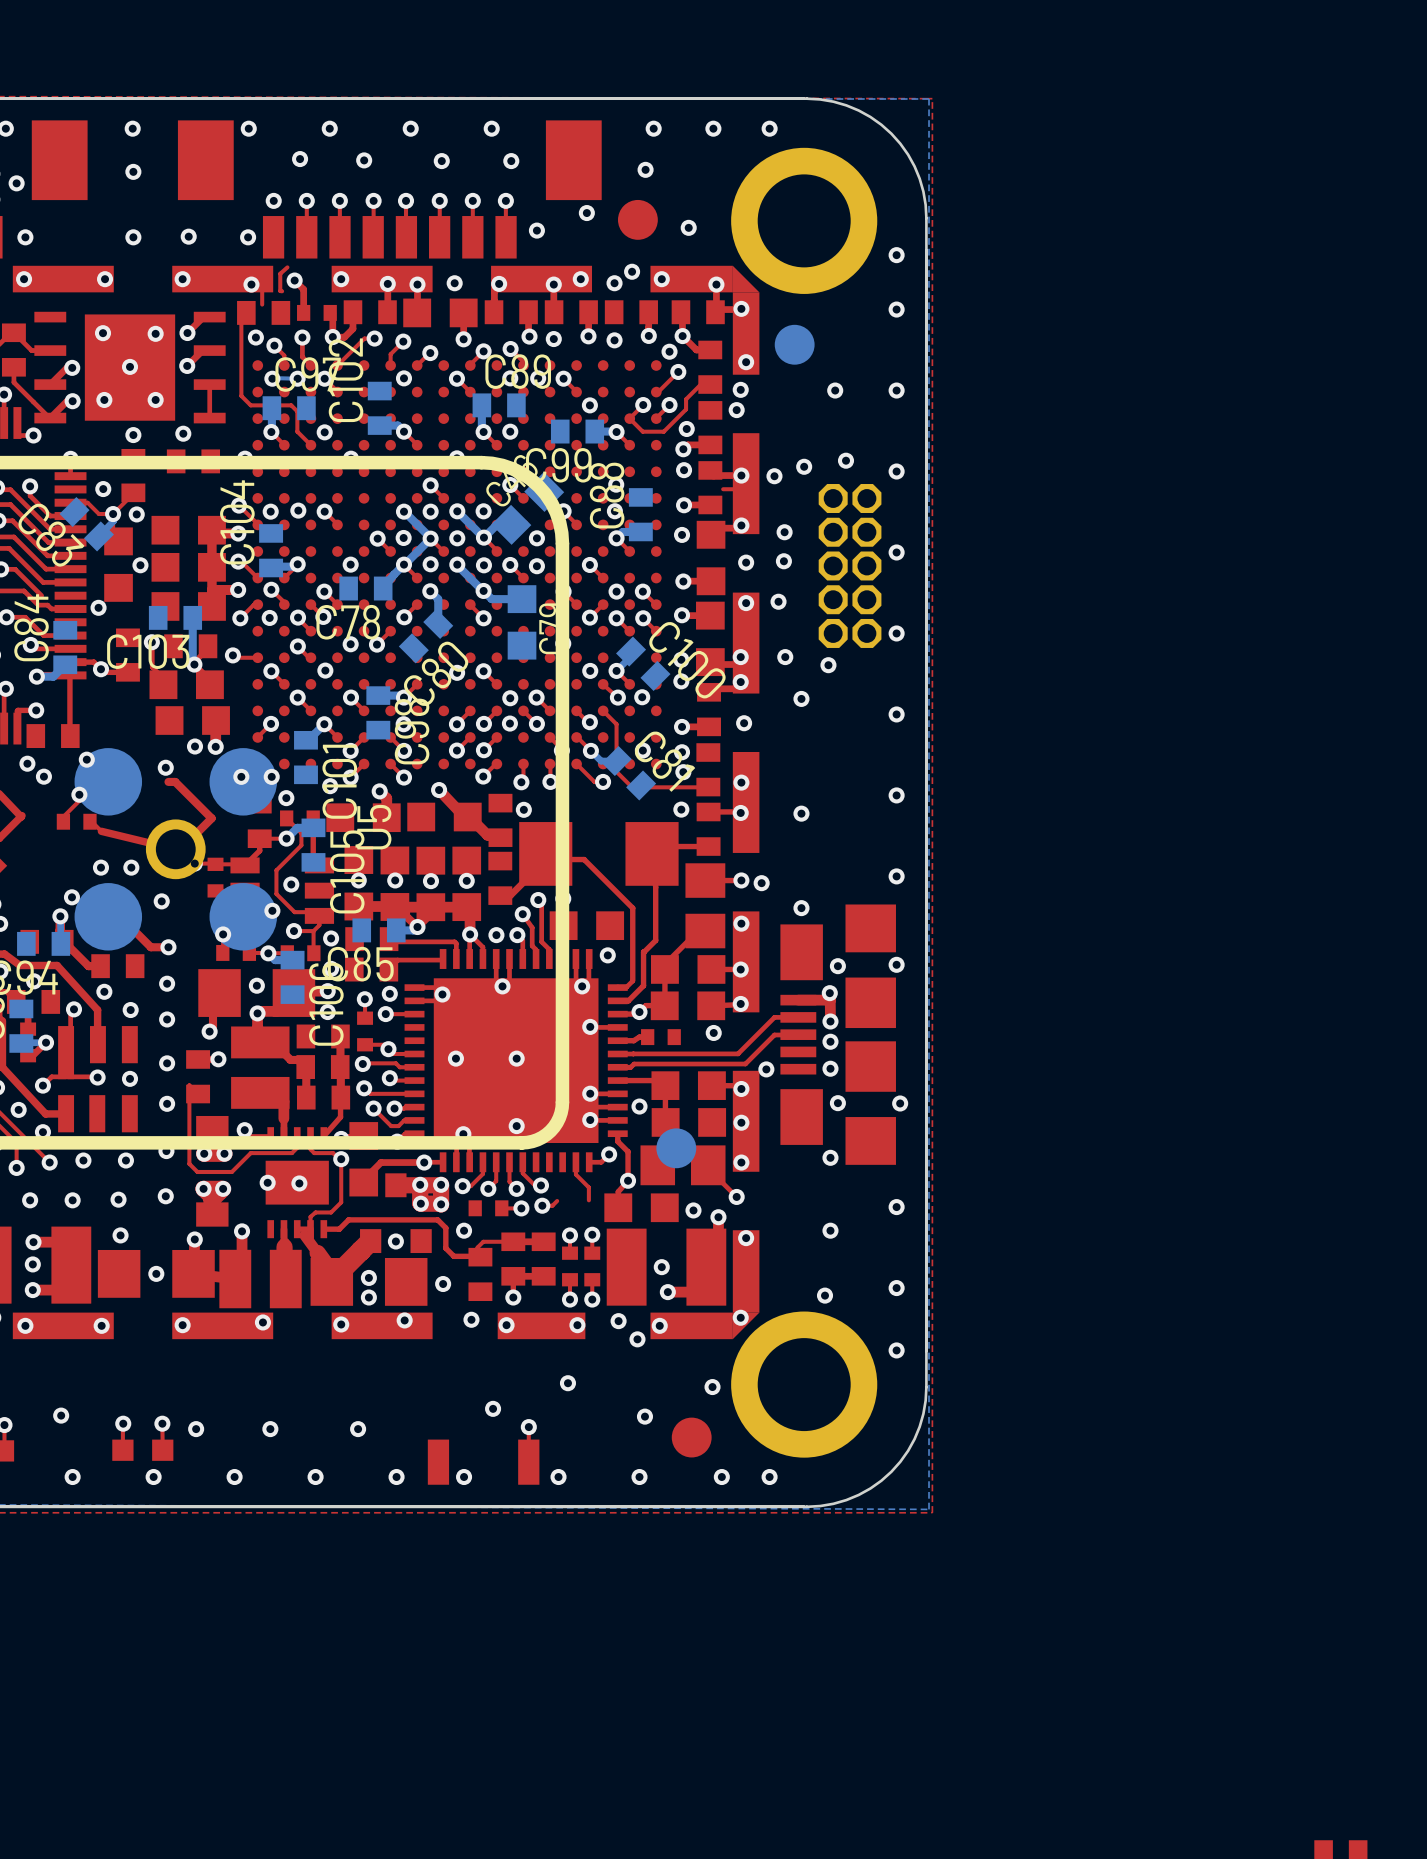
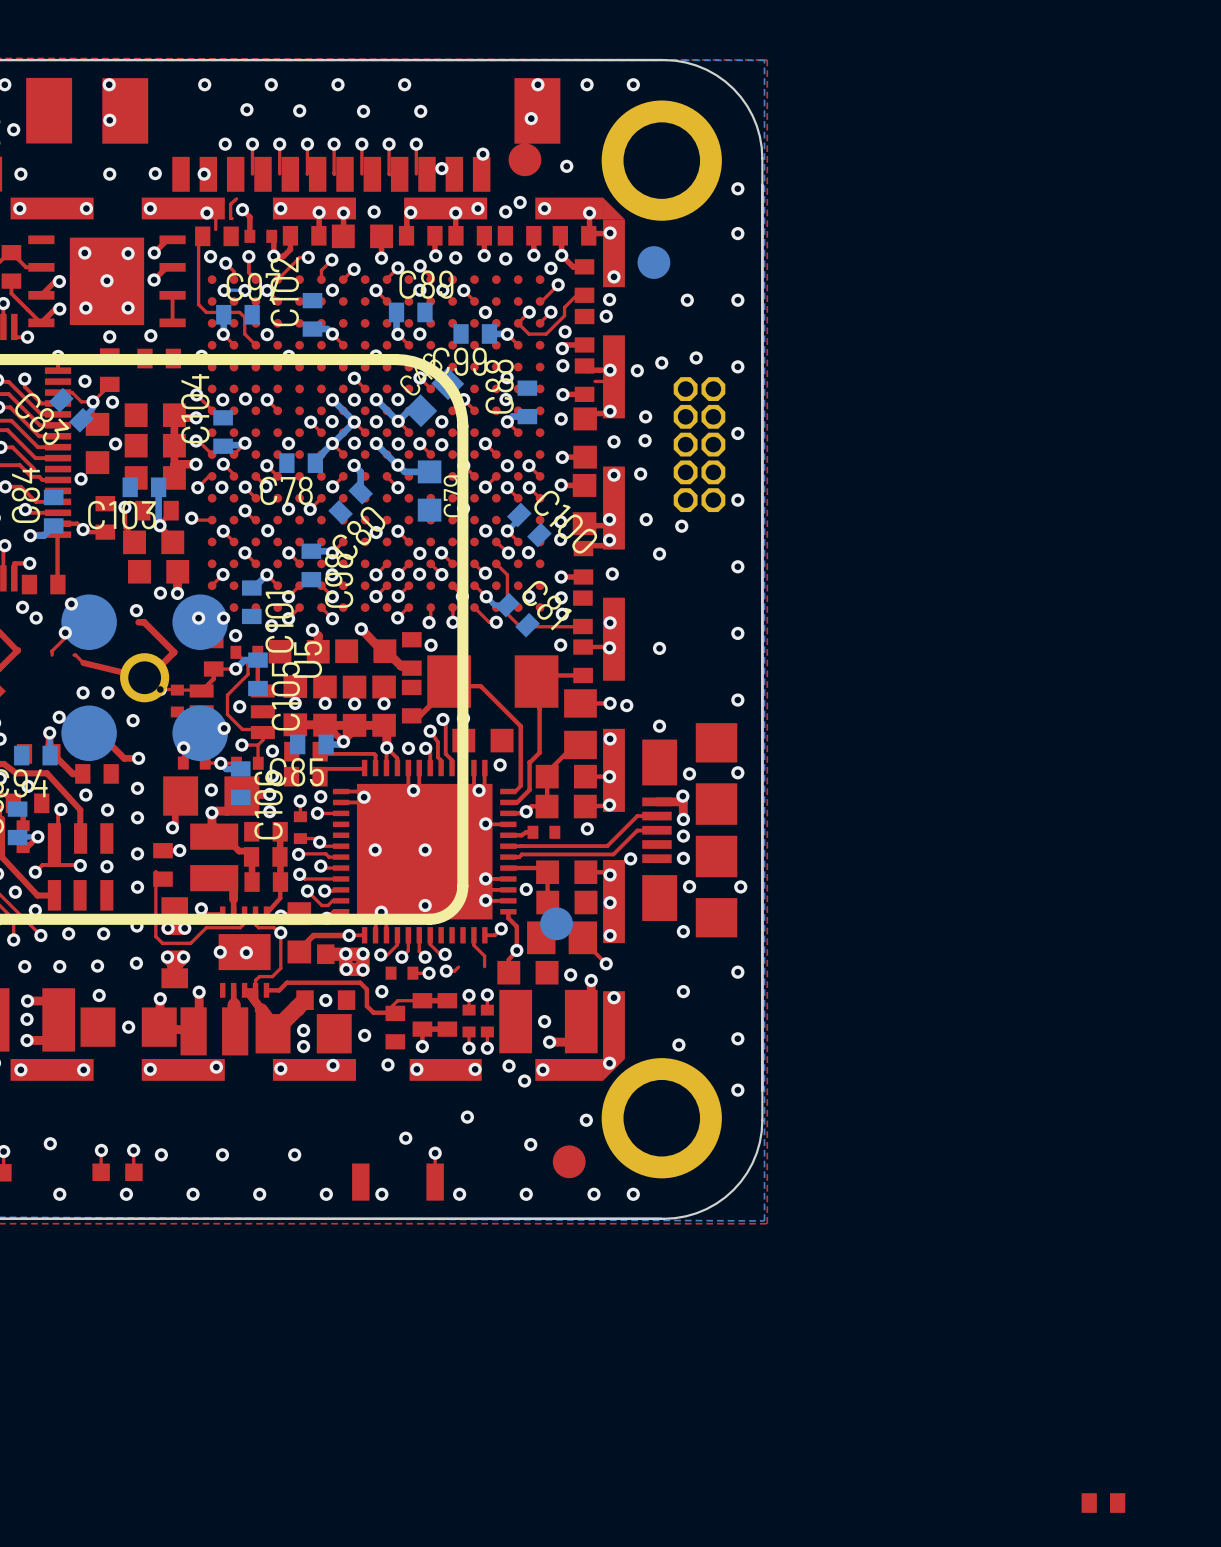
part footprint: [177, 120, 602, 259] -> [102, 78, 561, 192]
part: (76, 821) -> none

